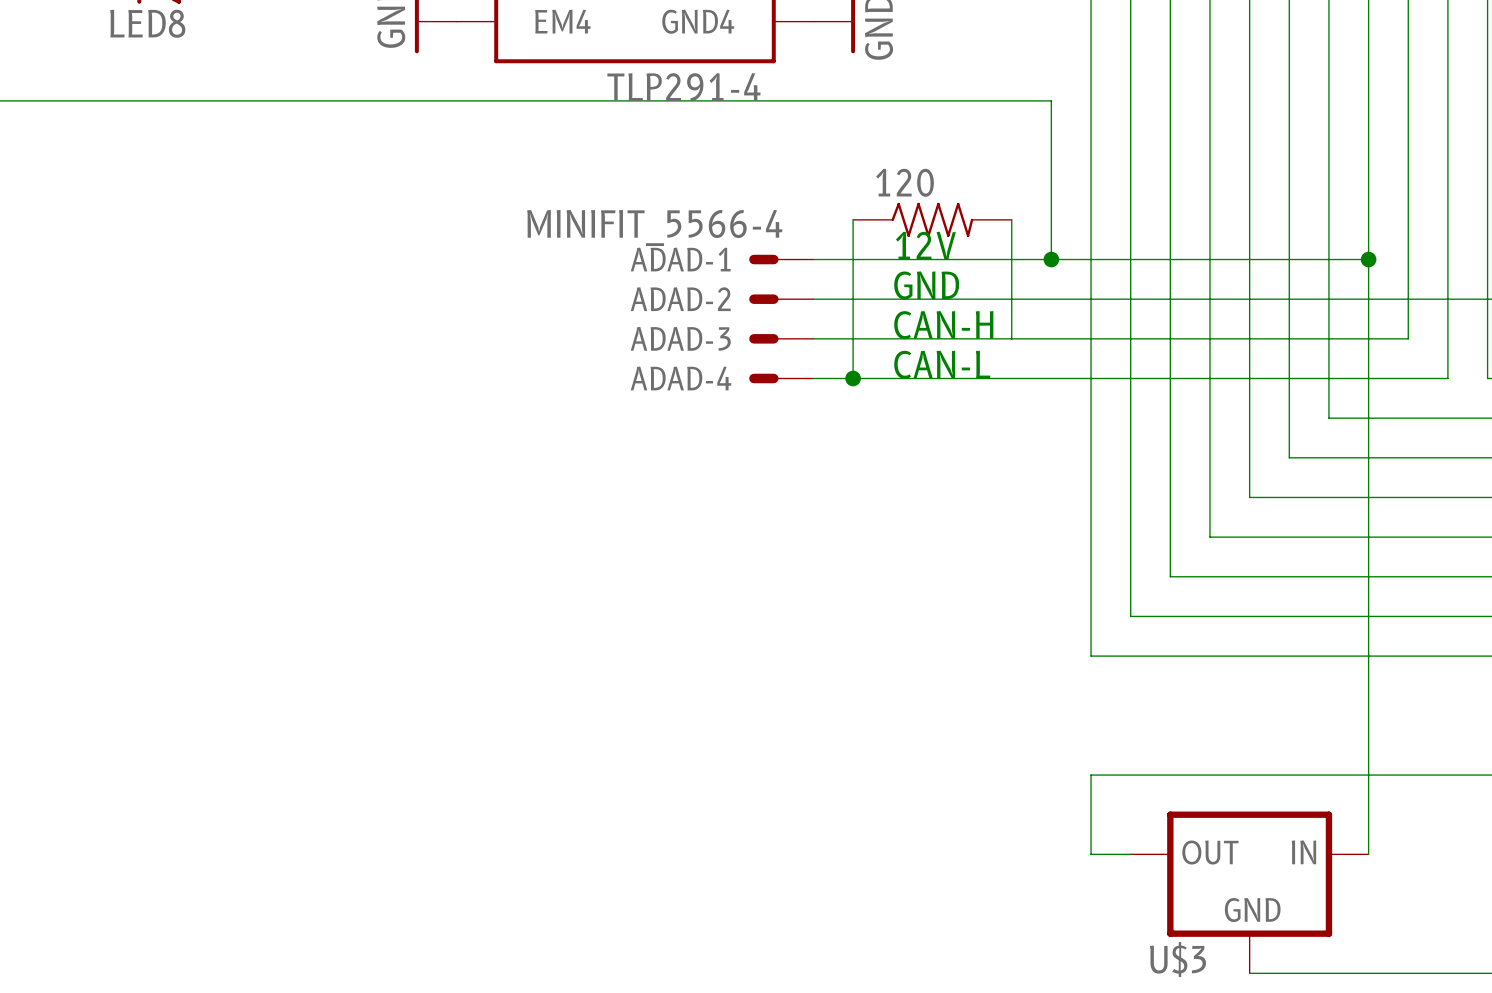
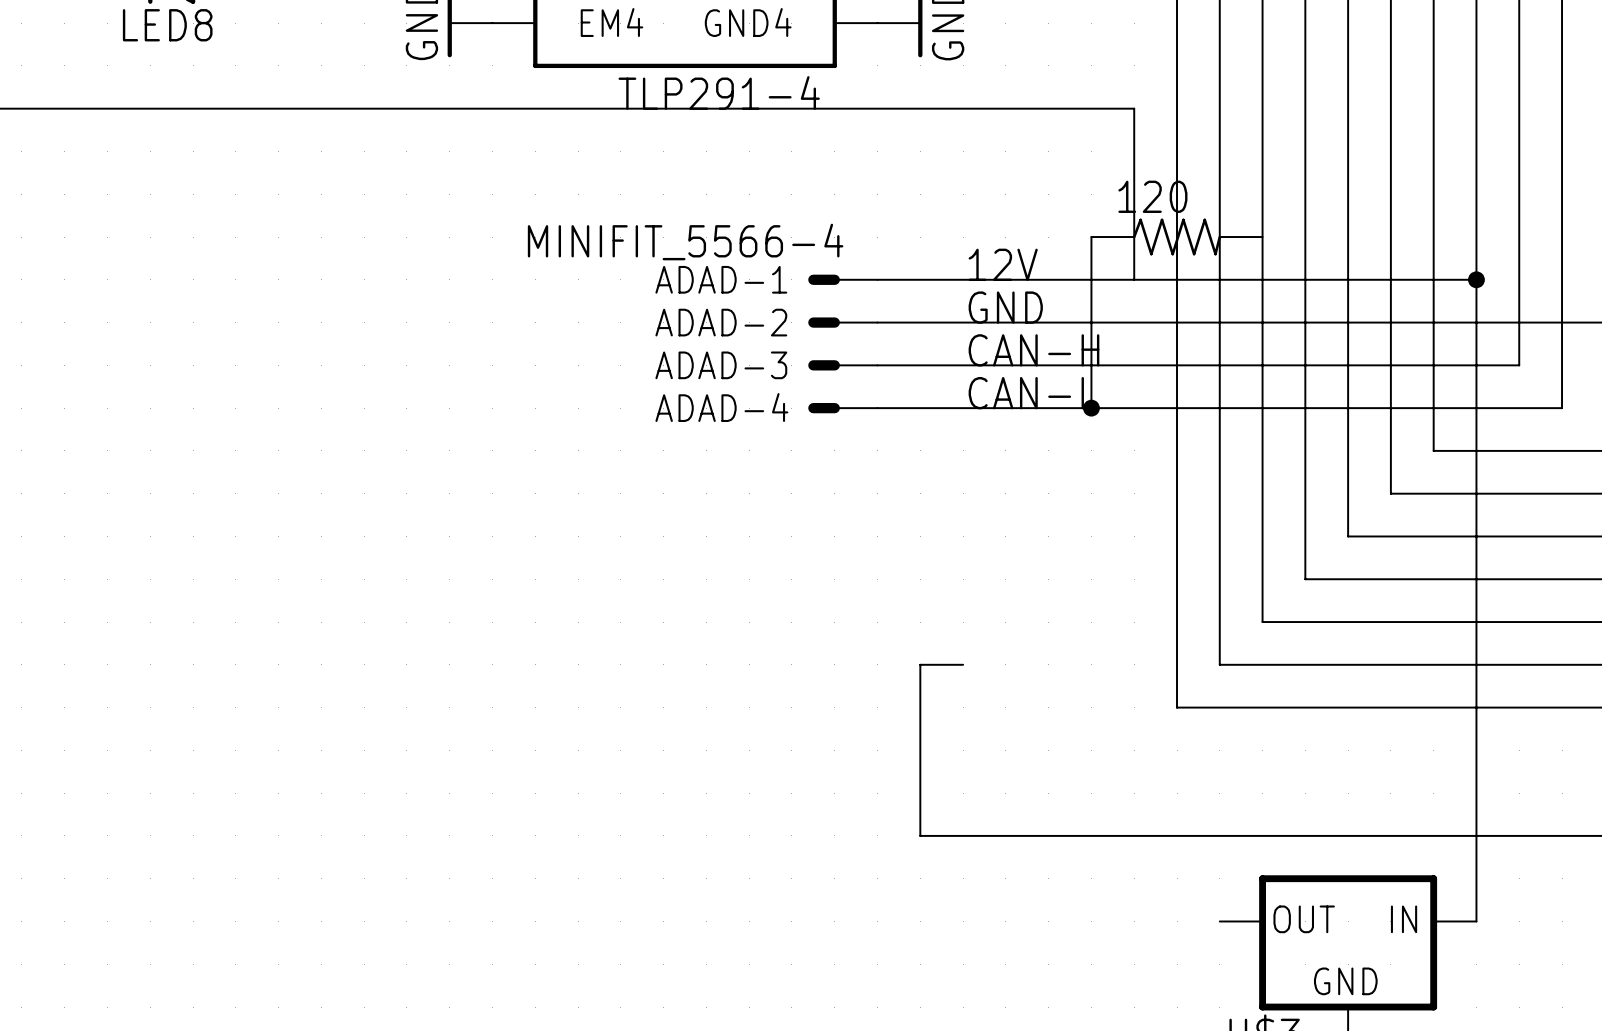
wire: (853, 219) (853, 378) -> none
120 position: (932, 219) -> (1177, 237)
junction: (1051, 259) -> none
wire: none -> (1091, 365) (1091, 408)
junction: (853, 378) -> none
junction: none -> (1091, 408)
wire: (1091, 775) (1091, 854) (1130, 854) -> (1177, 835) (920, 835) (920, 664) (963, 664)

